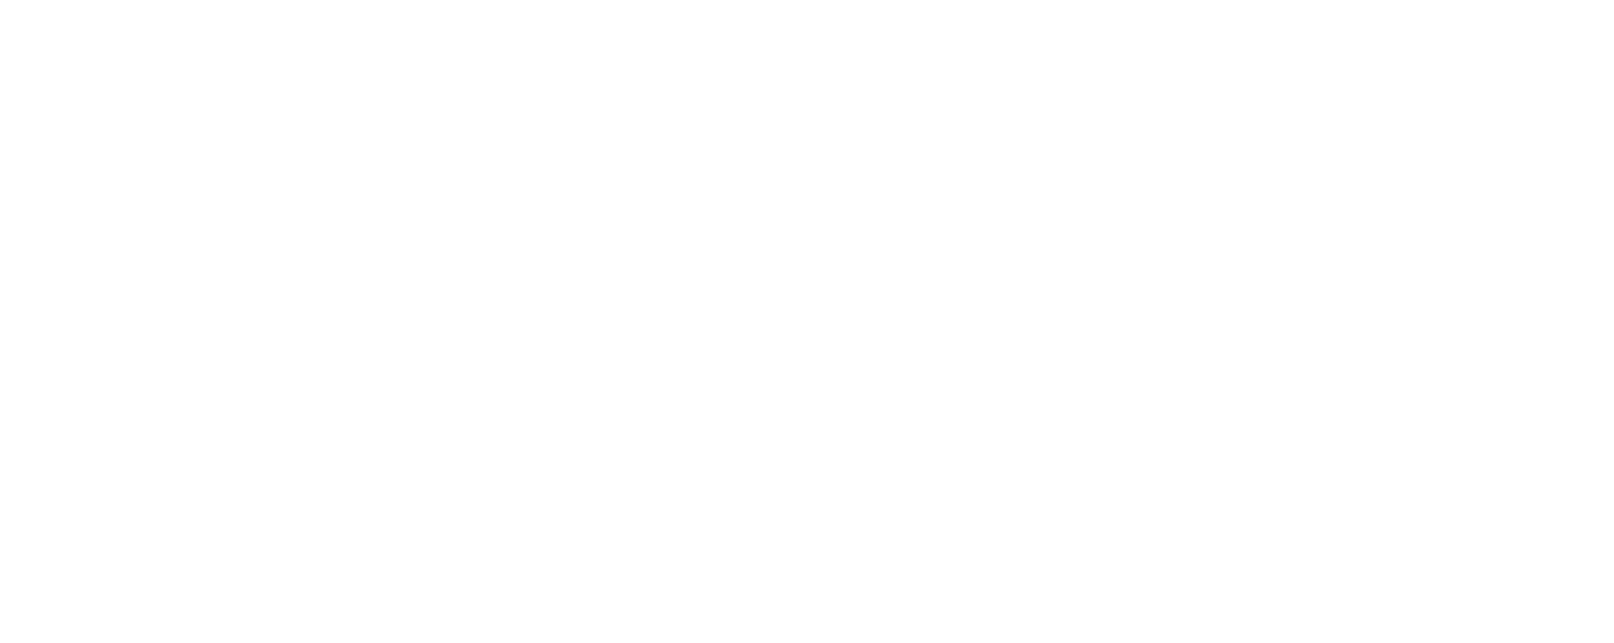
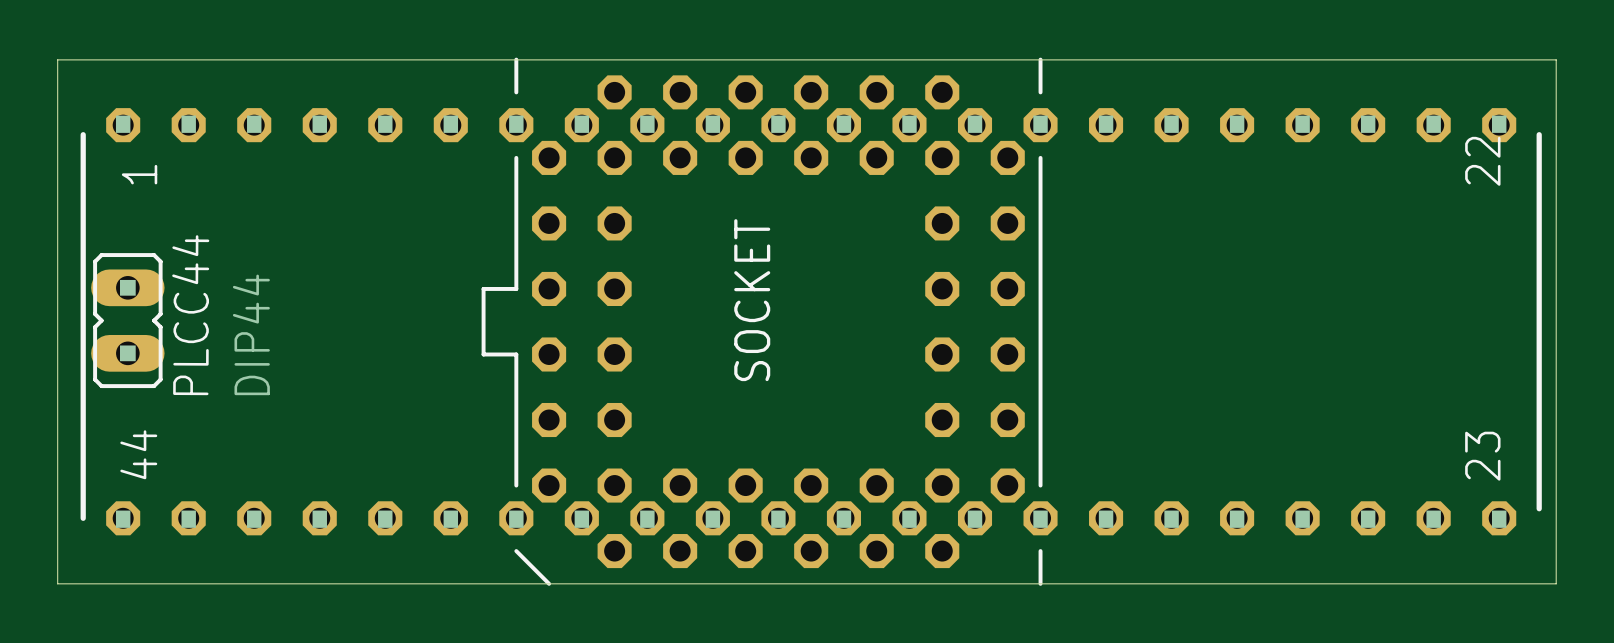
board edge: none -> (57, 59) (1556, 59) (1556, 583) (57, 583) (57, 59)
part: none -> (127, 320)
SOCKET: none -> (762, 321)
PLCC44: none -> DIP44 (811, 321)

